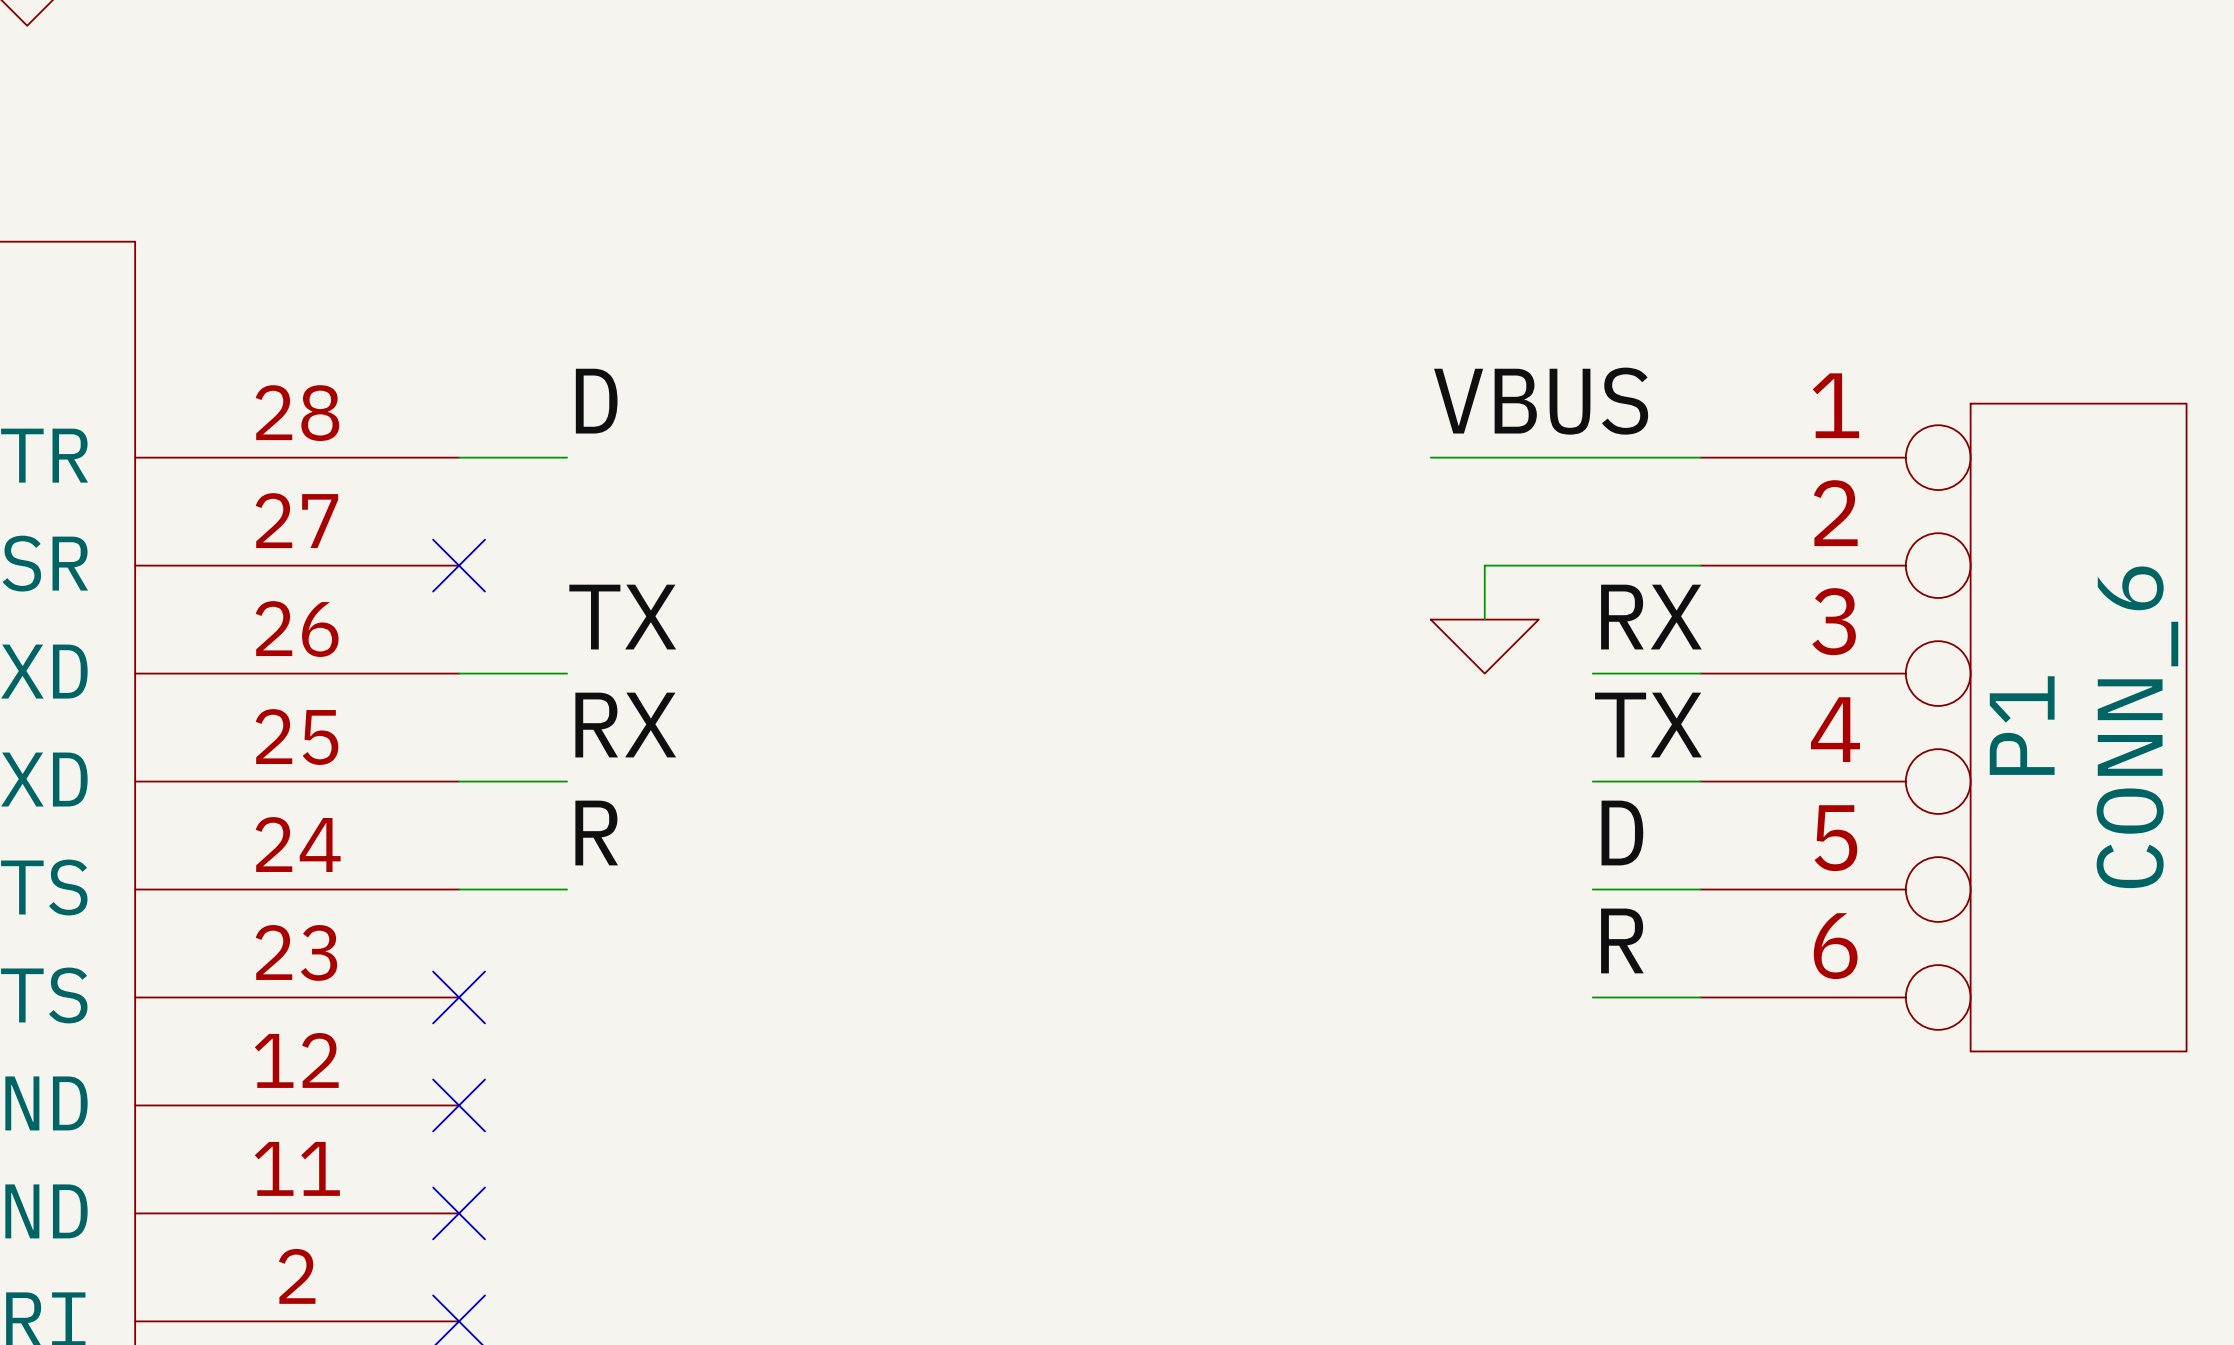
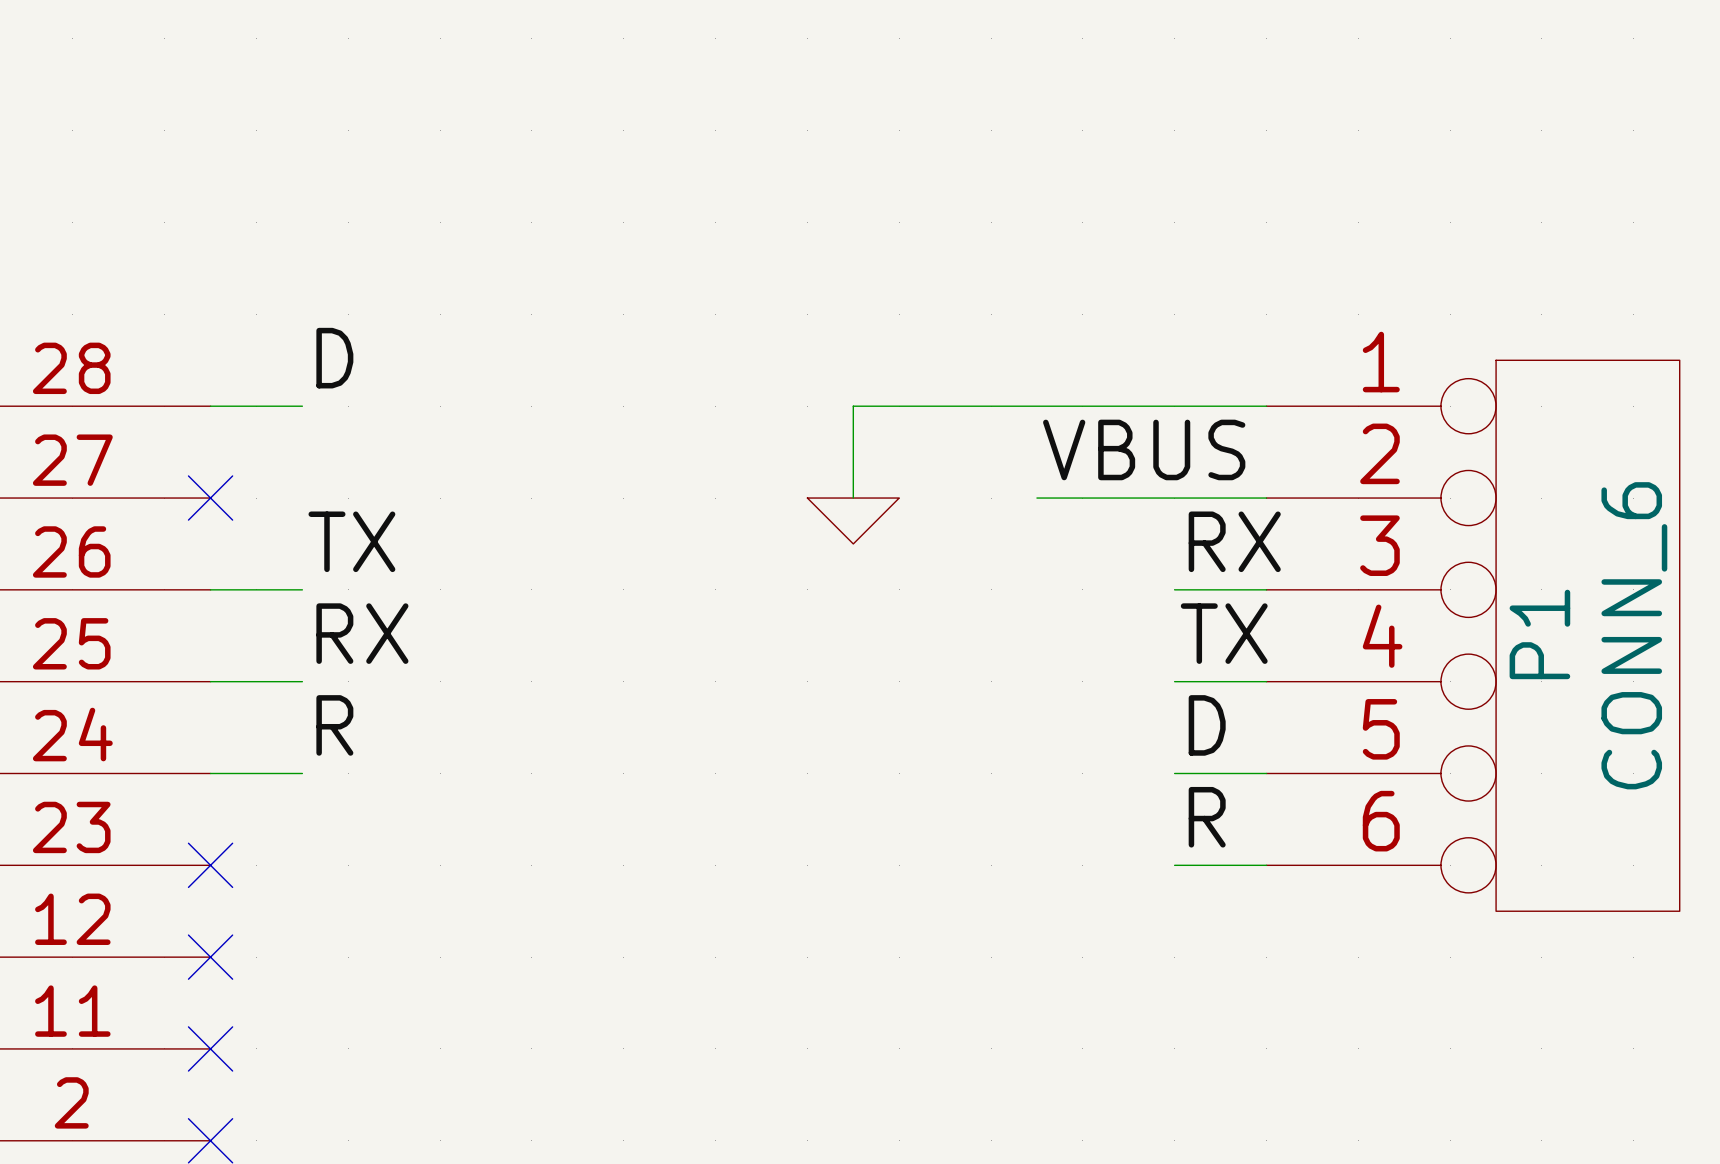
label position: VBUS (1541, 401) -> VBUS (1144, 449)
wire: none -> (1036, 406) (853, 406) (853, 498)
wire: (1484, 565) (1484, 619) -> (1082, 498) (1036, 498)
power symbol position: (1484, 646) -> (853, 520)

